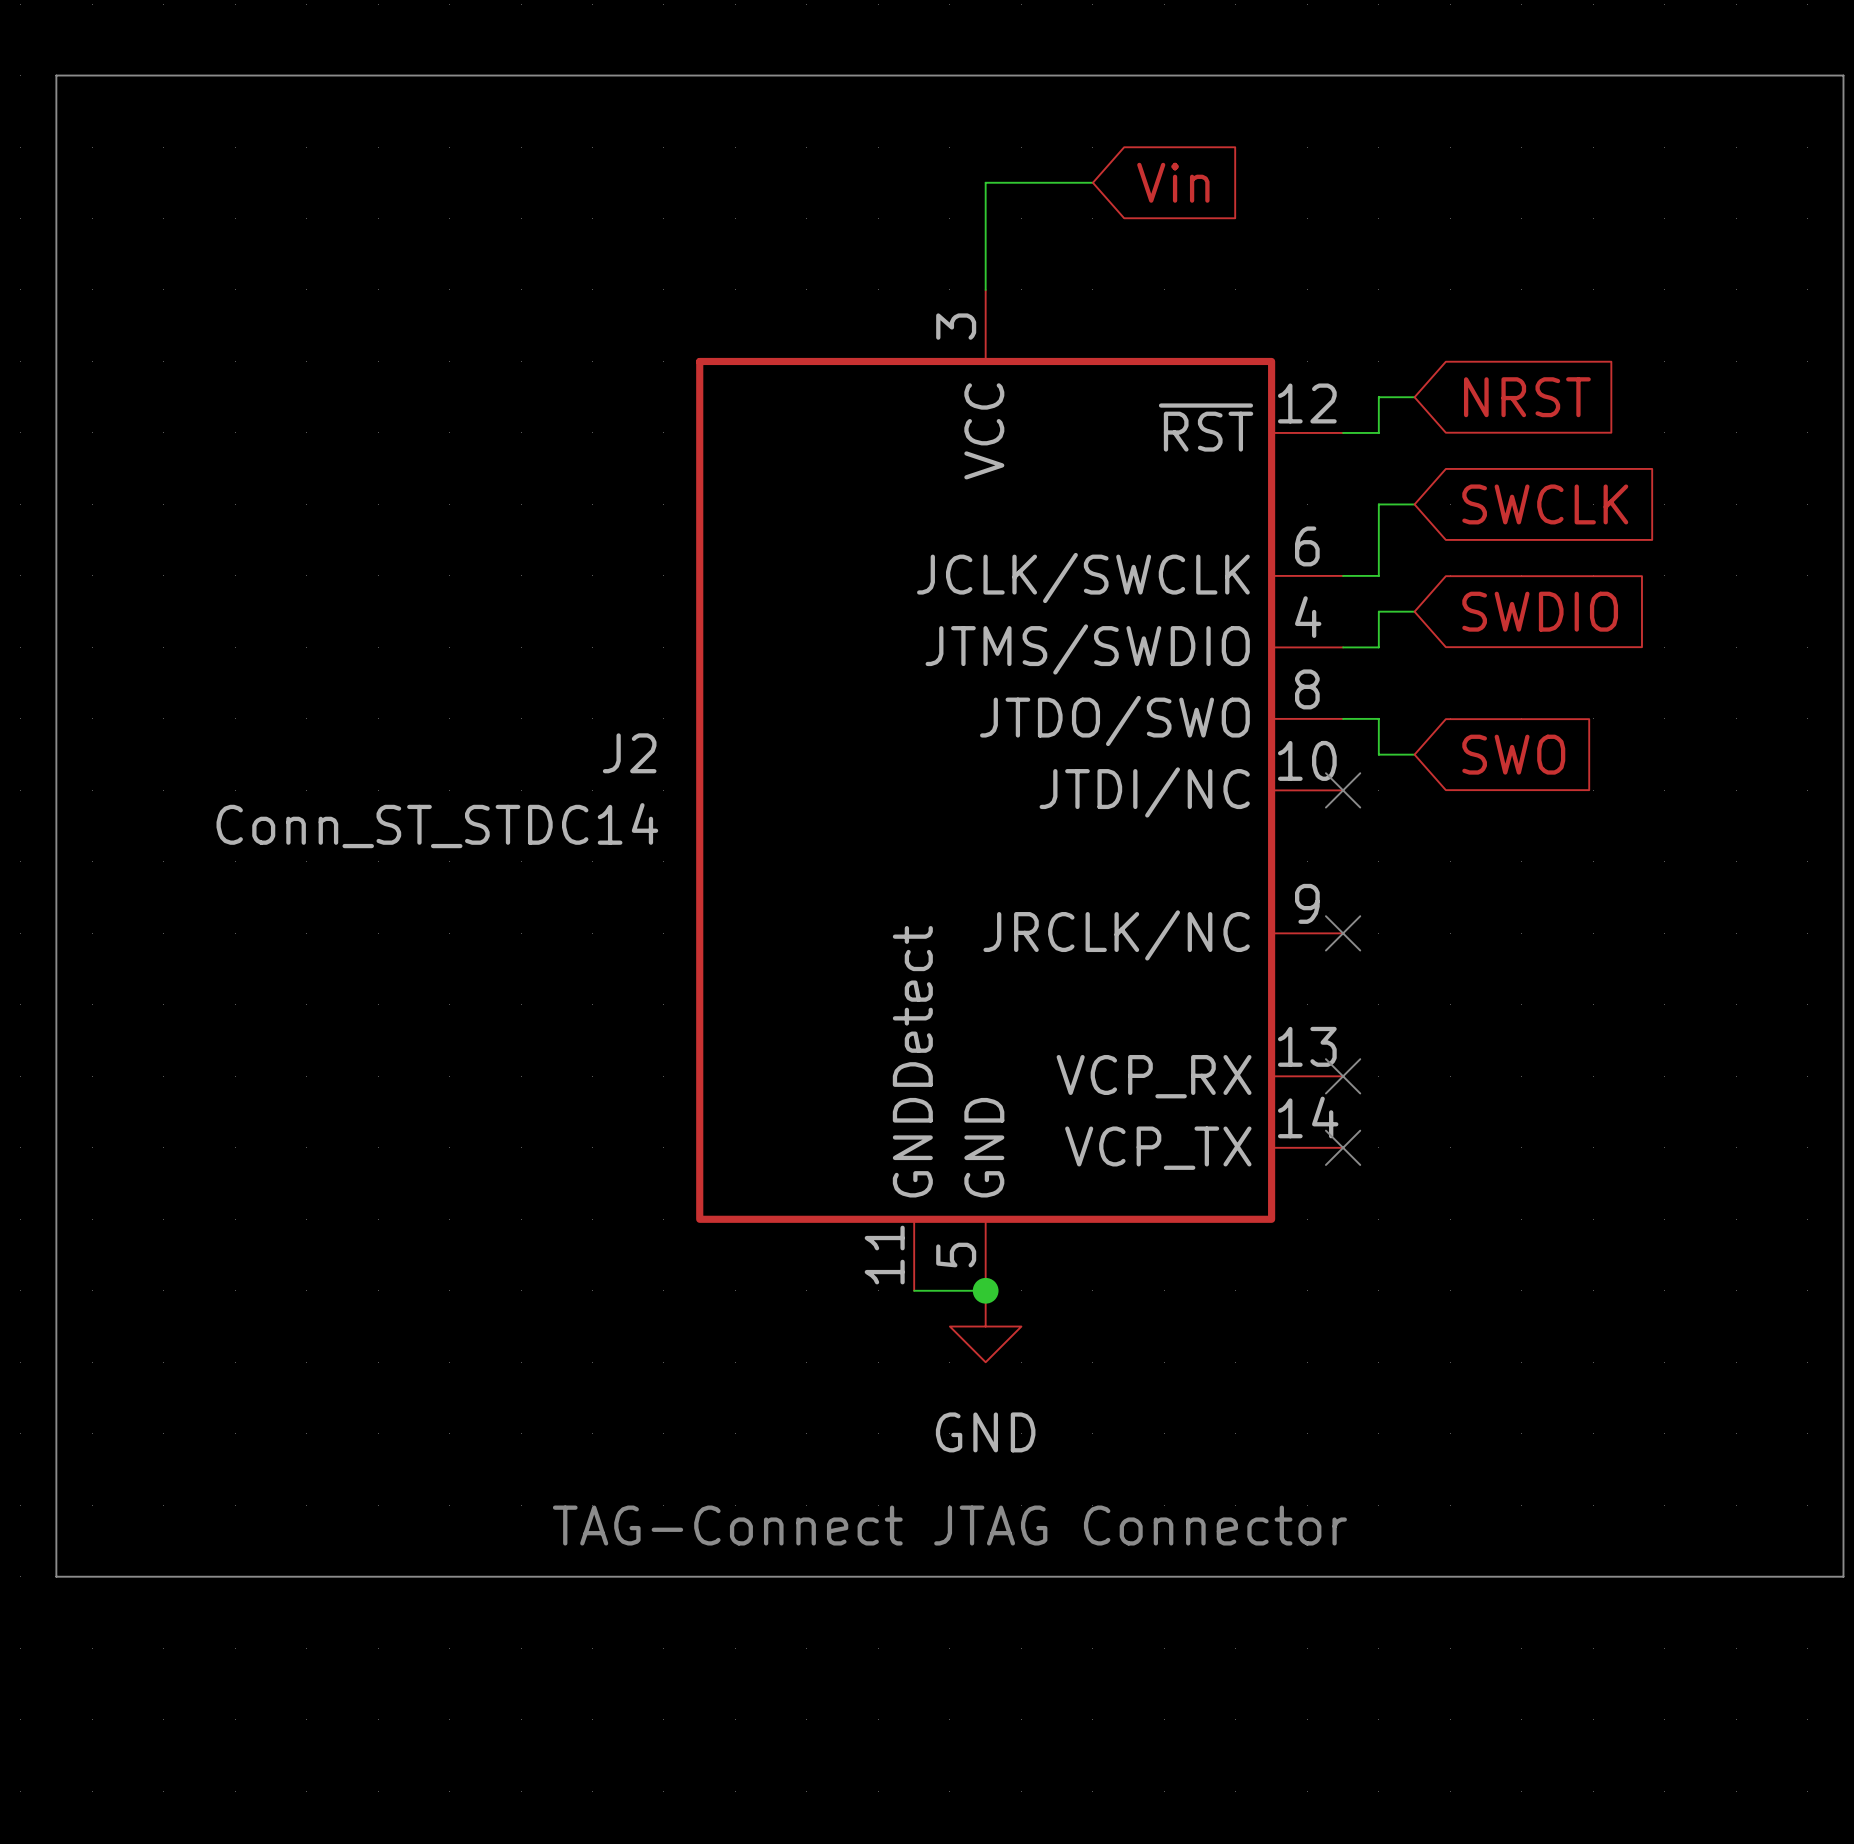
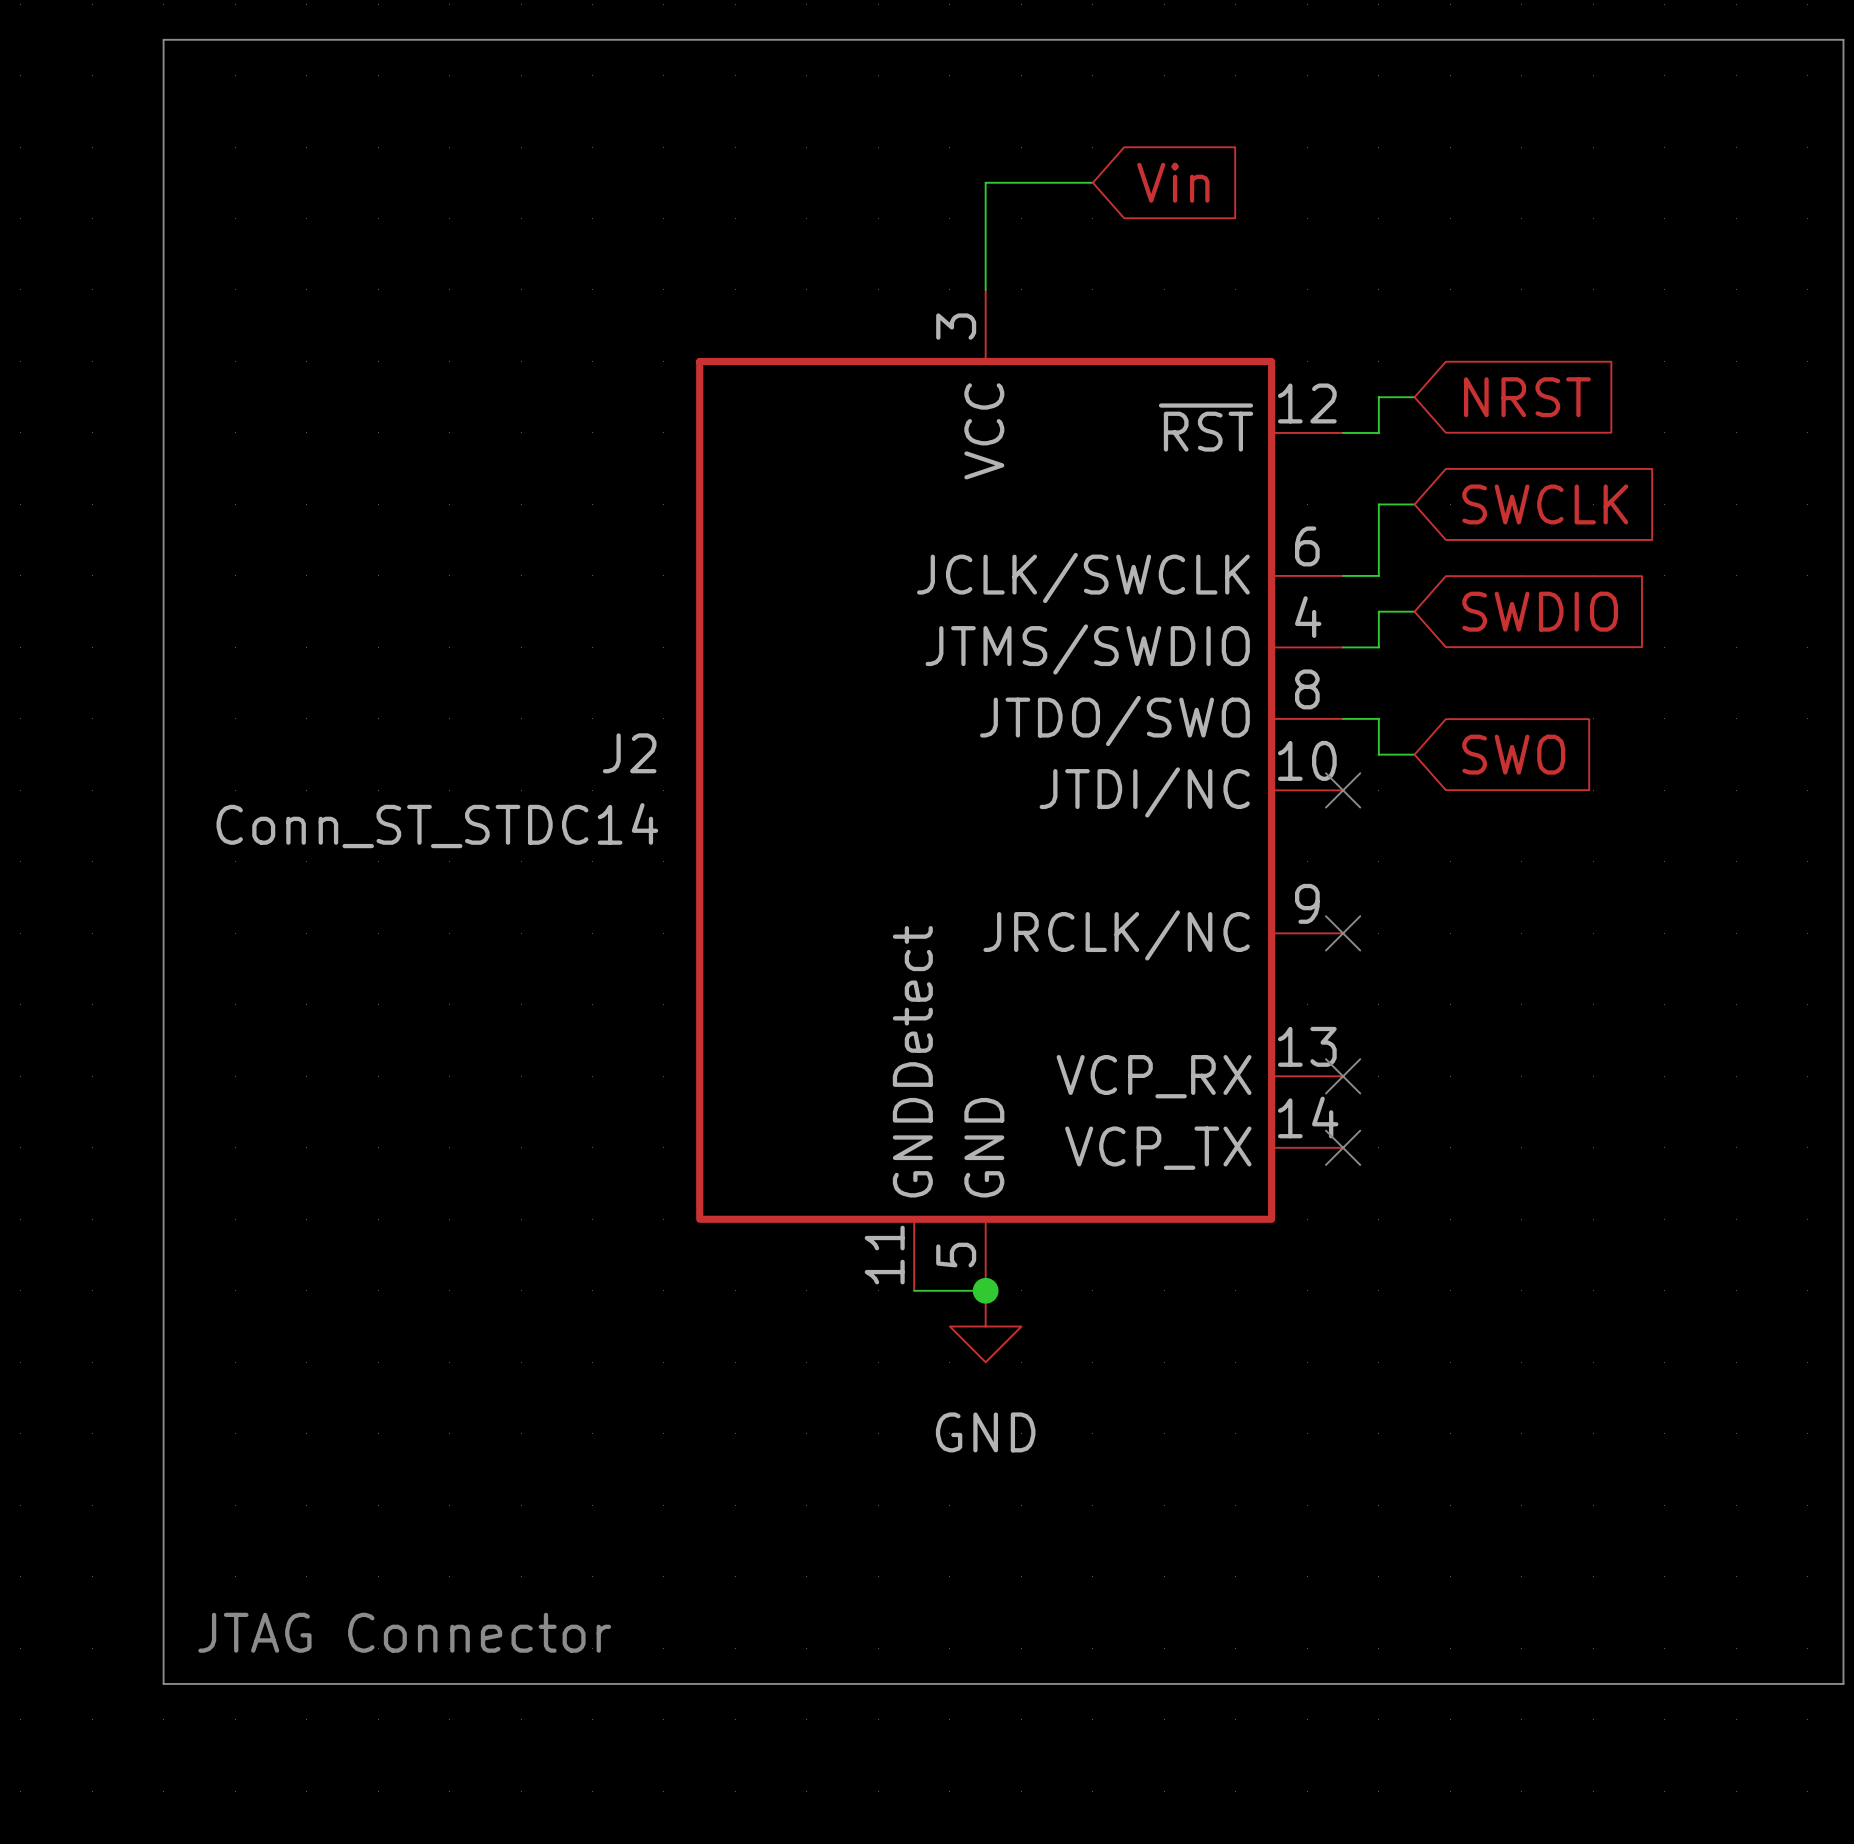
line: (1843, 75) (56, 75) (56, 1576) (1843, 1576) -> (1843, 75) (1843, 39) (163, 39) (163, 1683) (1843, 1683) (1843, 1576)
text: TAG-Connect JTAG Connector (949, 1525) -> none
text: none -> JTAG Connector (404, 1632)

